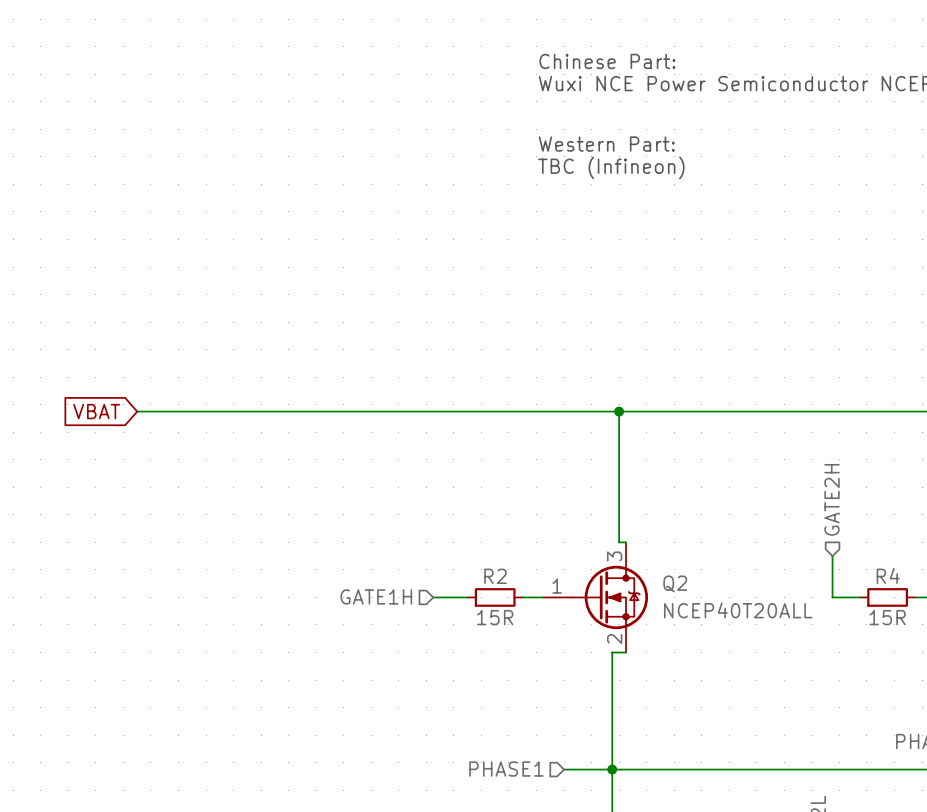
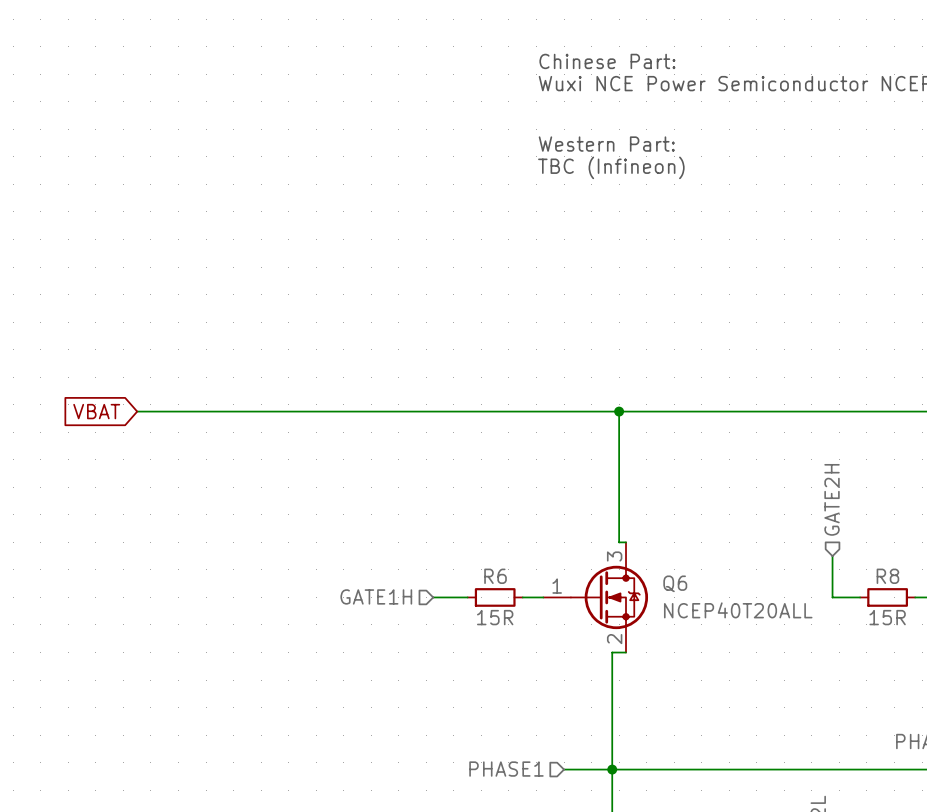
R4 name: R4 (888, 575) -> R8 (887, 576)
R2 name: R2 (495, 576) -> R6 (495, 576)
Q2 name: Q2 (675, 583) -> Q6 (675, 583)

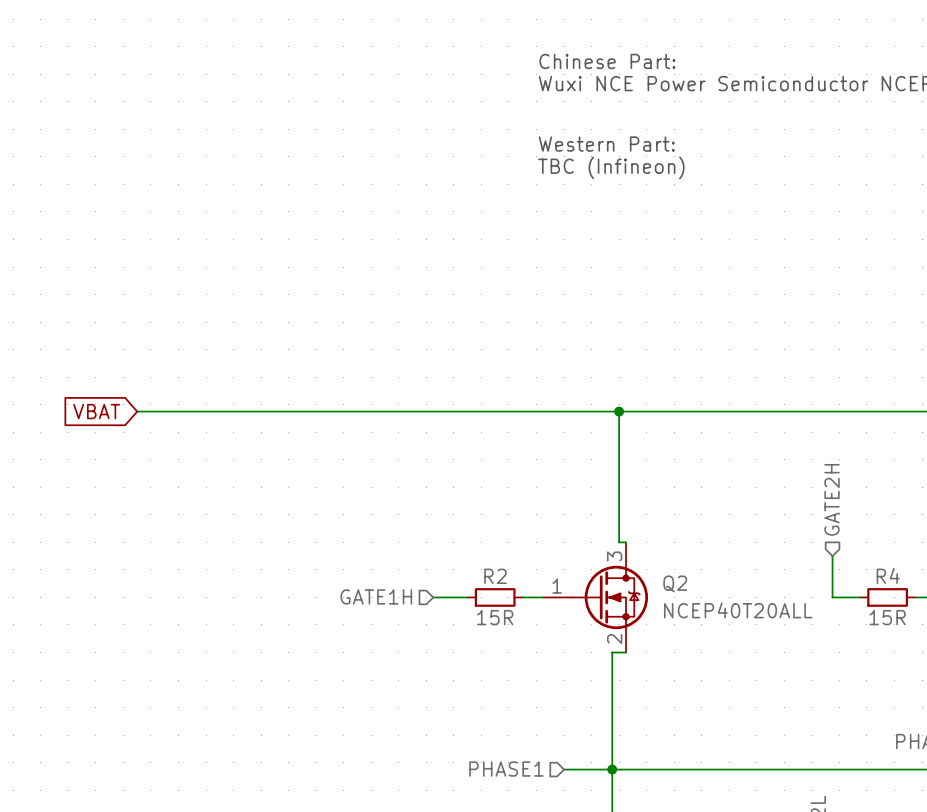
R6 name: R6 (495, 576) -> R2 (495, 576)
R8 name: R8 (887, 576) -> R4 (888, 575)
Q6 name: Q6 (675, 583) -> Q2 (675, 583)

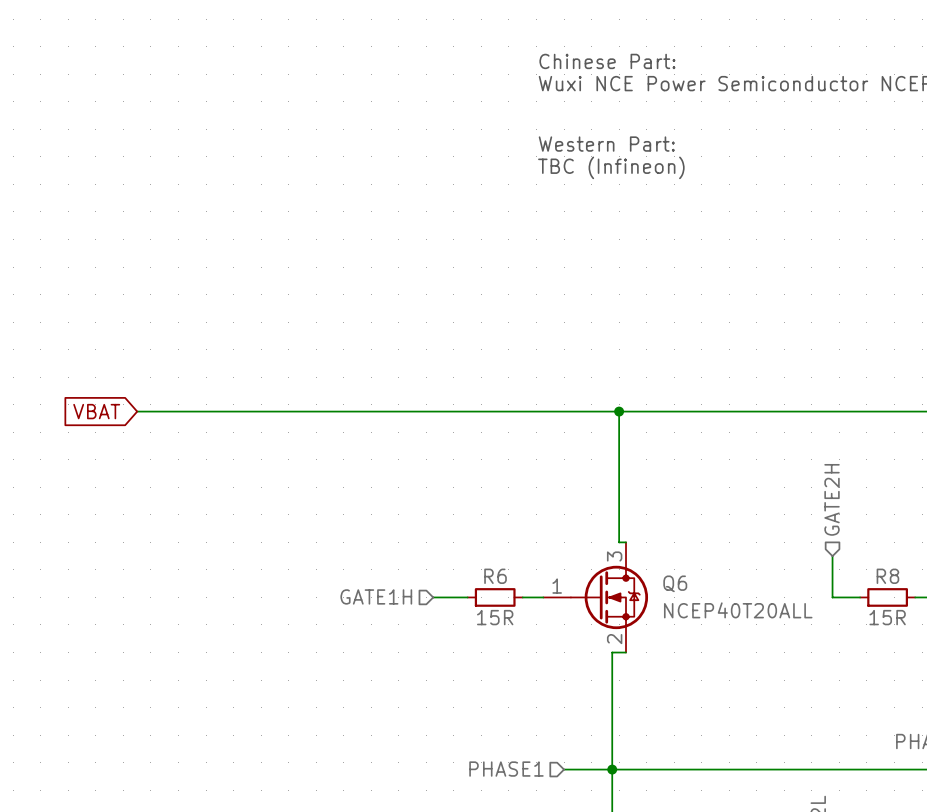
R4 name: R4 (888, 575) -> R8 (887, 576)
R2 name: R2 (495, 576) -> R6 (495, 576)
Q2 name: Q2 (675, 583) -> Q6 (675, 583)

